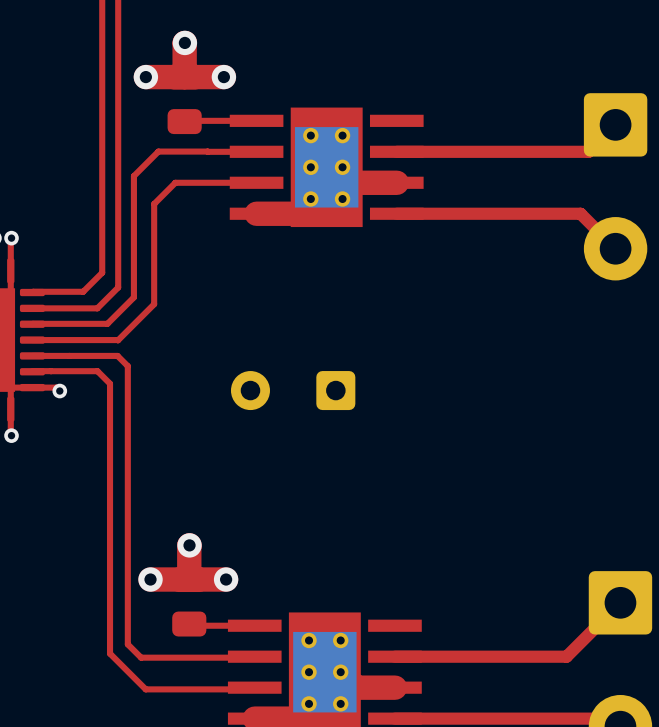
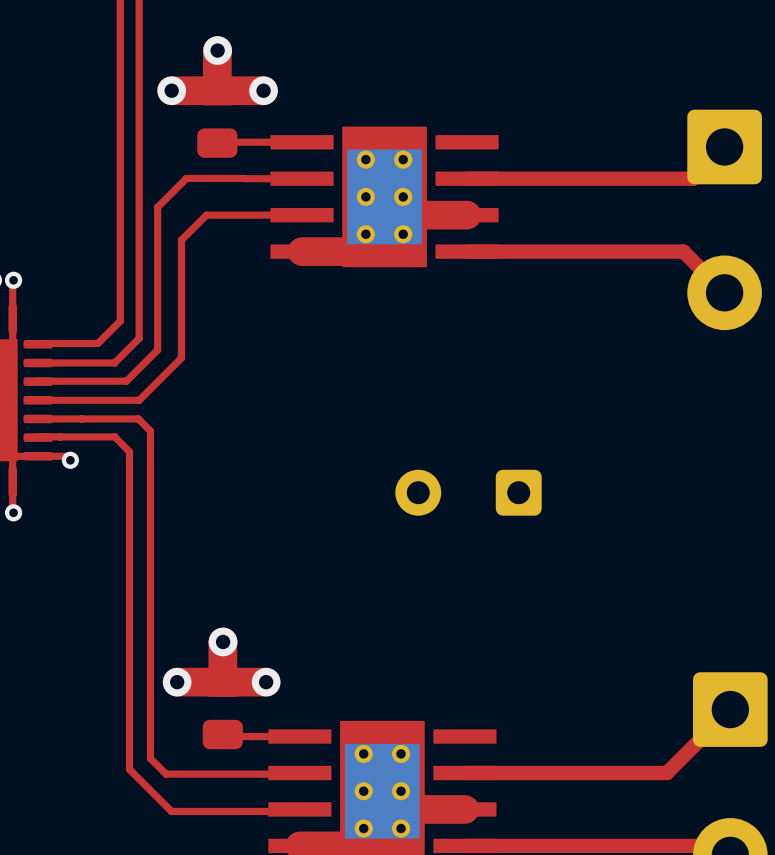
part position: (293, 390) -> (468, 492)

